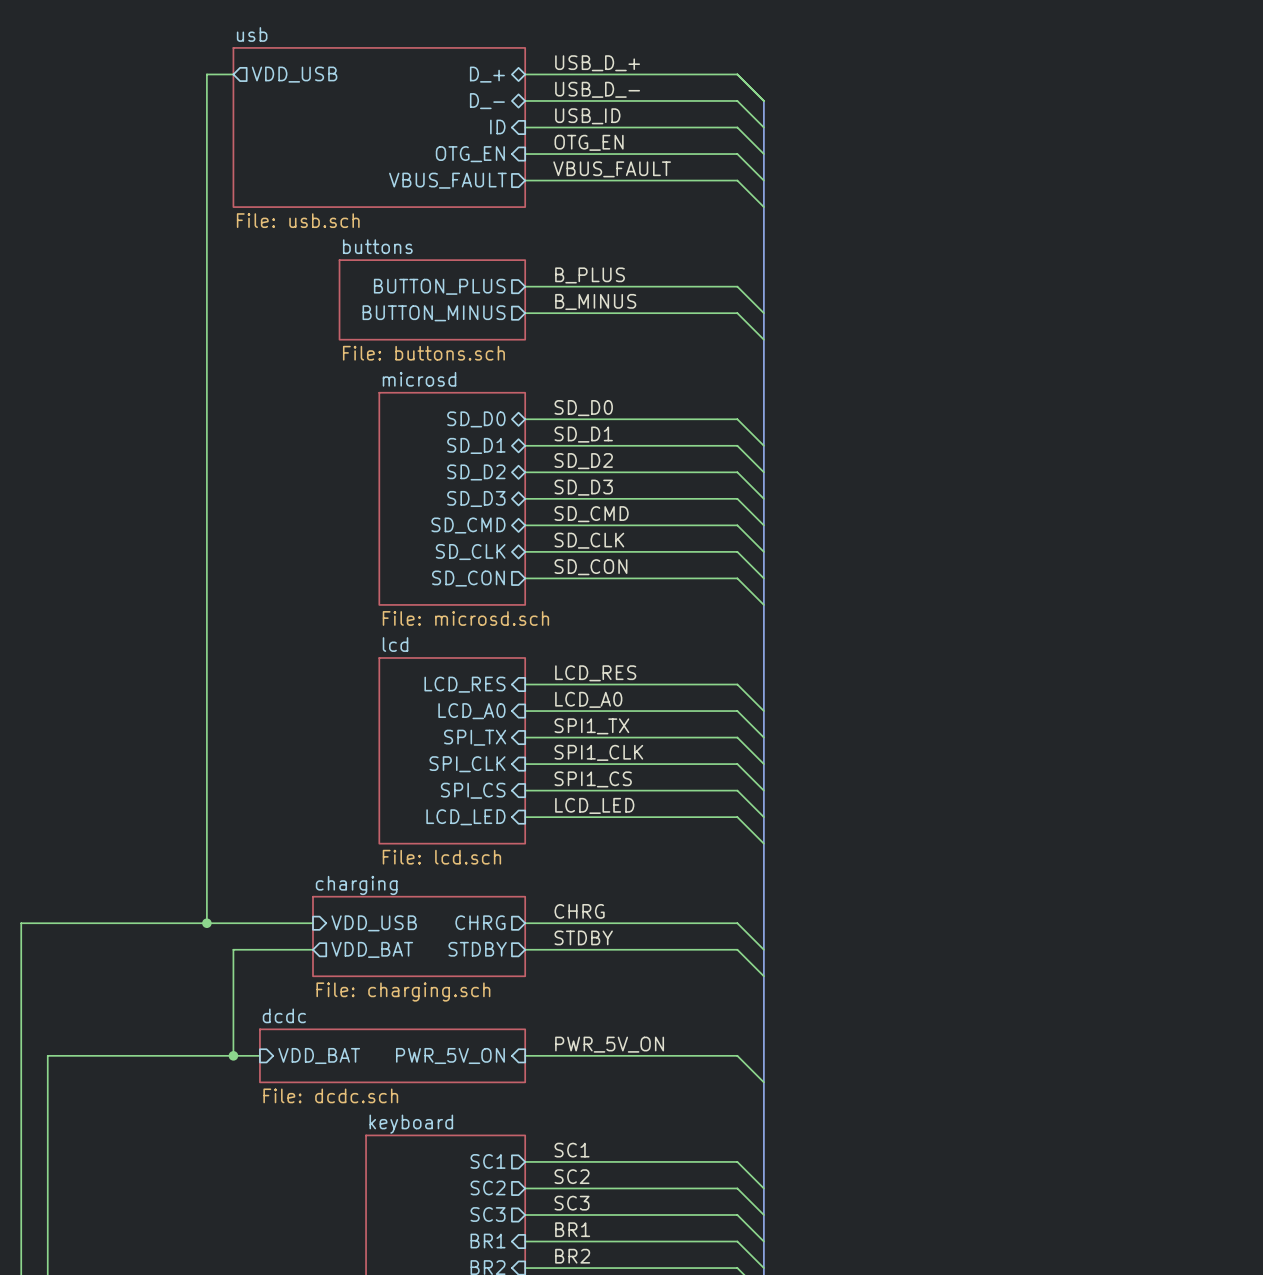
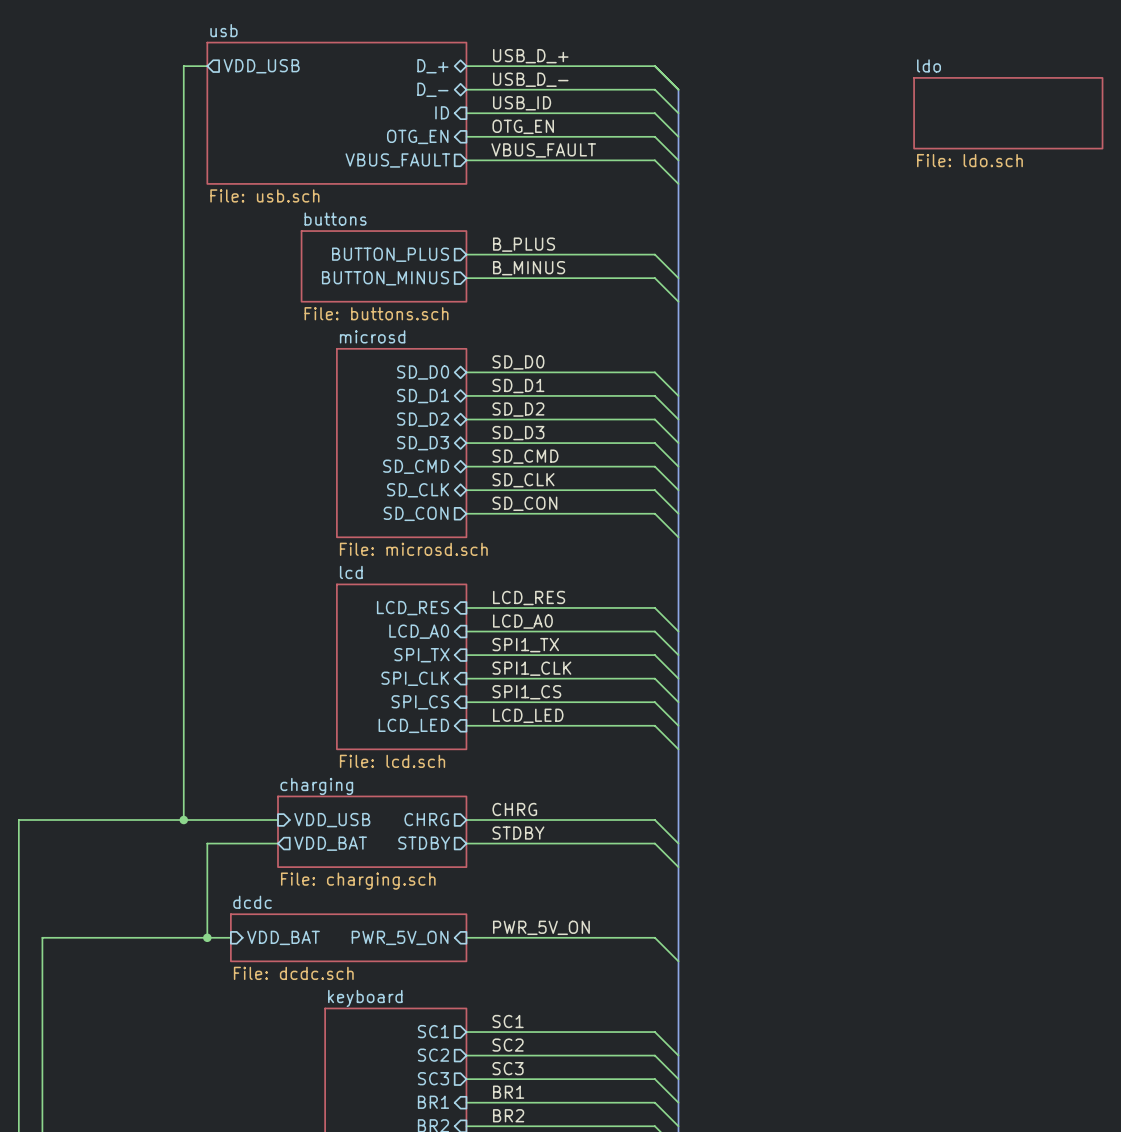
sheet ldo: none -> File: ldo.sch (1008, 113)

